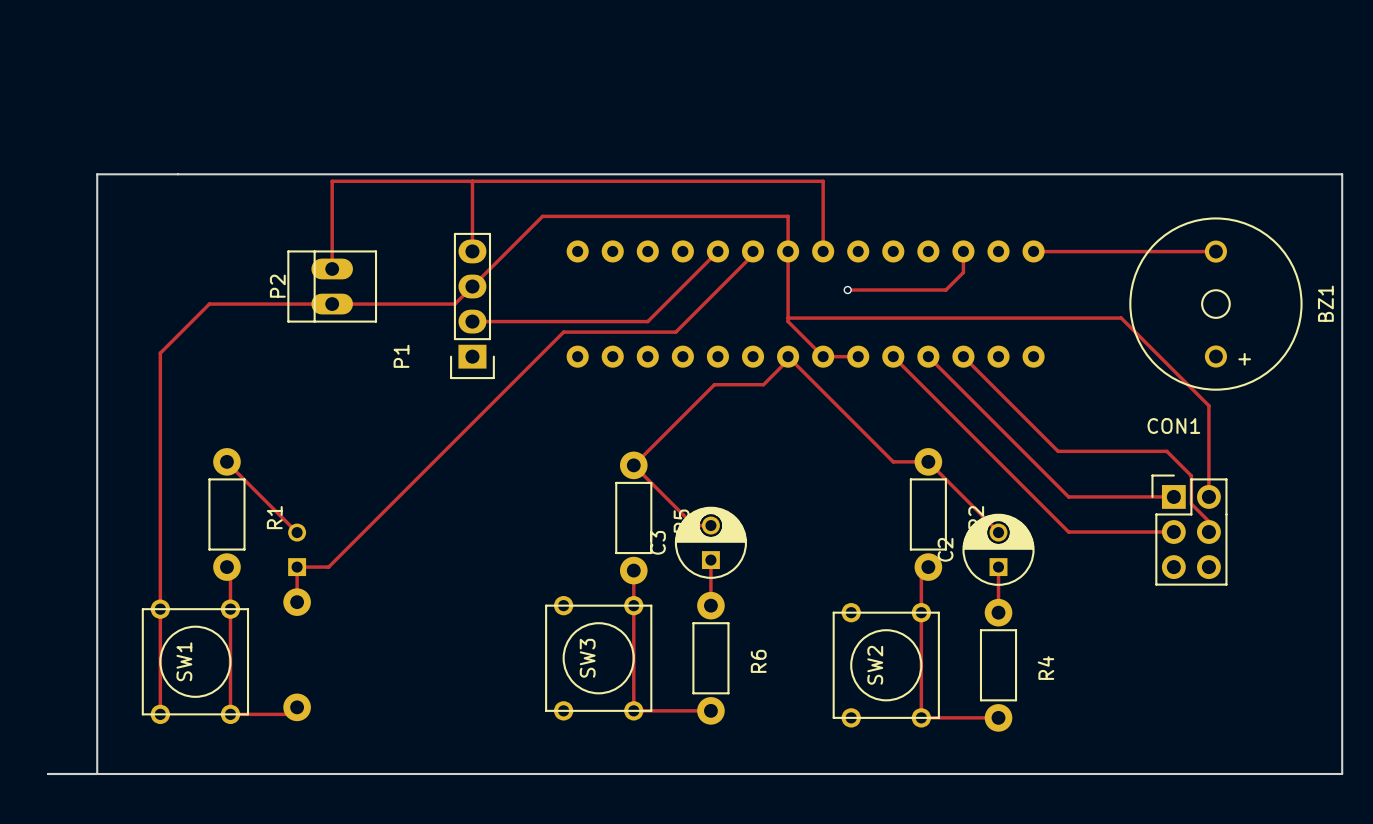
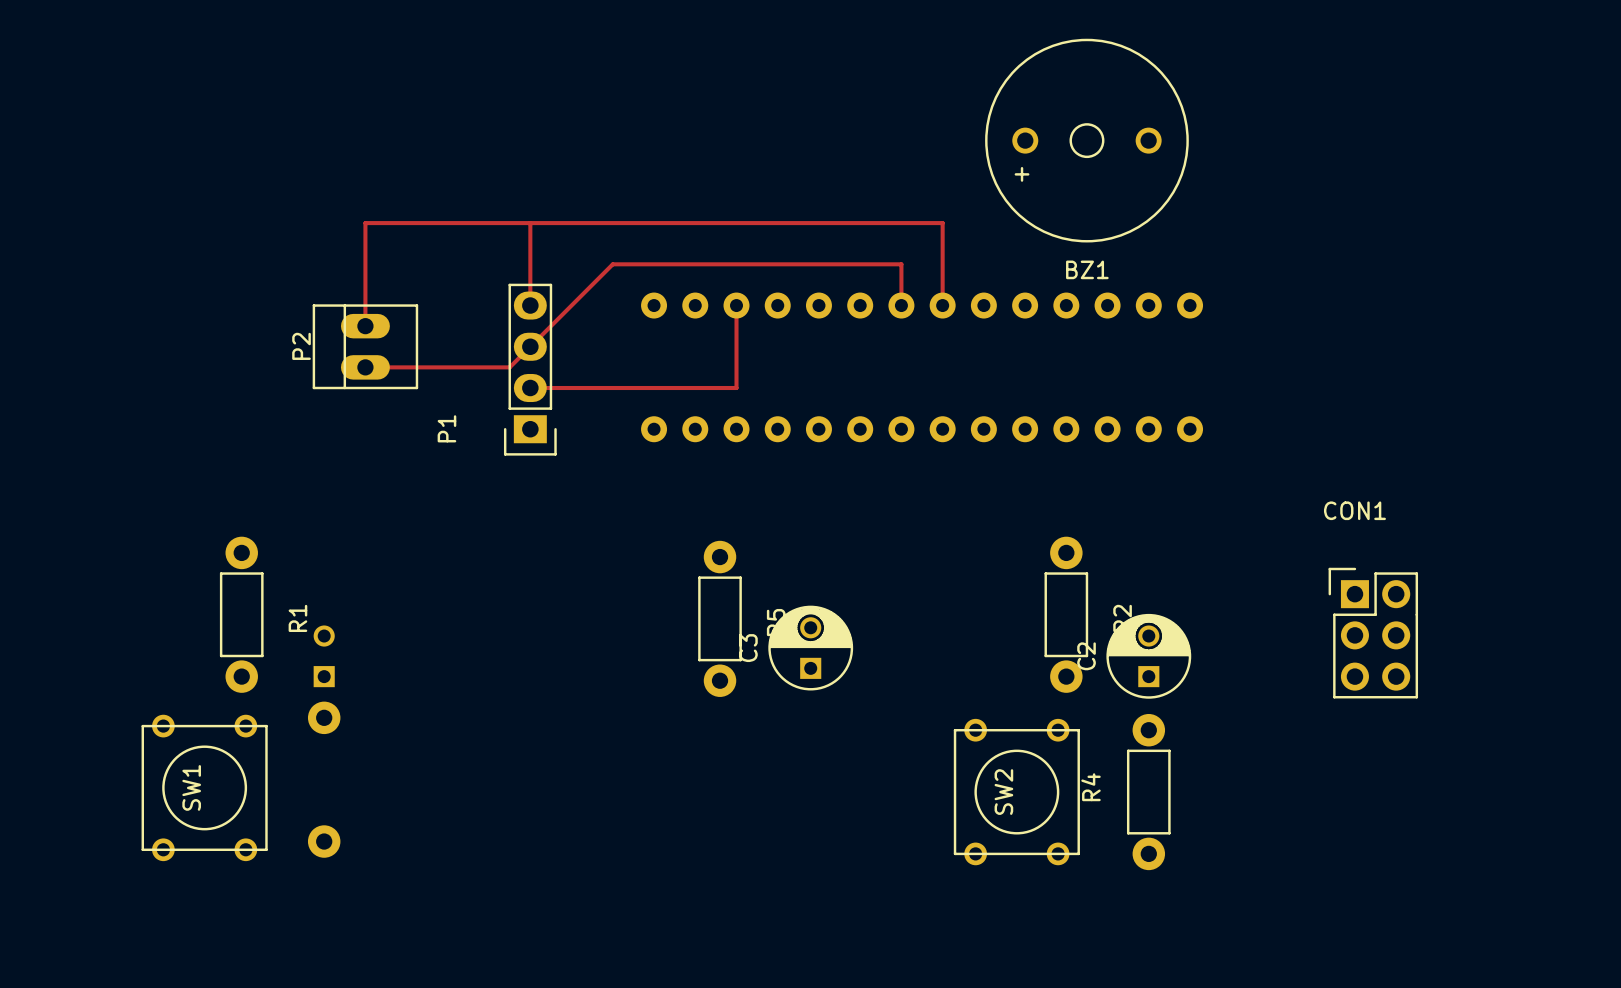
track: (717, 251) (647, 321) -> (736, 305) (736, 388)
track: (753, 251) (753, 254) (675, 332) (563, 332) (328, 567) (297, 567) (297, 602) -> none
track: (788, 251) (788, 321) (823, 356) (858, 356) -> none
track: (963, 251) (963, 272) (945, 290) (847, 290) -> none
track: (1033, 251) (1215, 251) -> none
via: (847, 290) -> none
track: (332, 304) (209, 304) (160, 353) (160, 714) -> none
BZ1 rotation: 0° (1215, 304) -> 90° clockwise (1086, 140)
BZ1 position: (1215, 304) -> (1086, 140)
track: (788, 318) (1121, 318) (1208, 405) (1208, 496) -> none
track: (893, 356) (1068, 532) (1173, 532) -> none
track: (928, 356) (1068, 496) (1173, 496) -> none
track: (963, 356) (1058, 451) (1166, 451) (1191, 475) (1191, 503) (1208, 521) (1208, 532) -> none
track: (226, 461) (297, 532) -> none
track: (710, 525) (693, 525) (633, 465) (714, 384) (763, 384) (788, 360) (788, 356) (893, 461) (928, 461) (998, 532) -> none
track: (710, 560) (710, 605) -> none
track: (226, 567) (230, 570) (230, 714) (290, 714) (297, 707) -> none
track: (928, 567) (921, 574) (921, 717) (998, 717) -> none
track: (998, 567) (998, 612) -> none
track: (633, 570) (633, 710) (710, 710) -> none
SW3: (598, 658) -> none
R6: (710, 658) -> none
R4 name position: R4 (1045, 668) -> R4 (1091, 787)
board edge: (48, 773) (1342, 773) (1342, 174) (97, 174) (97, 773) -> none

